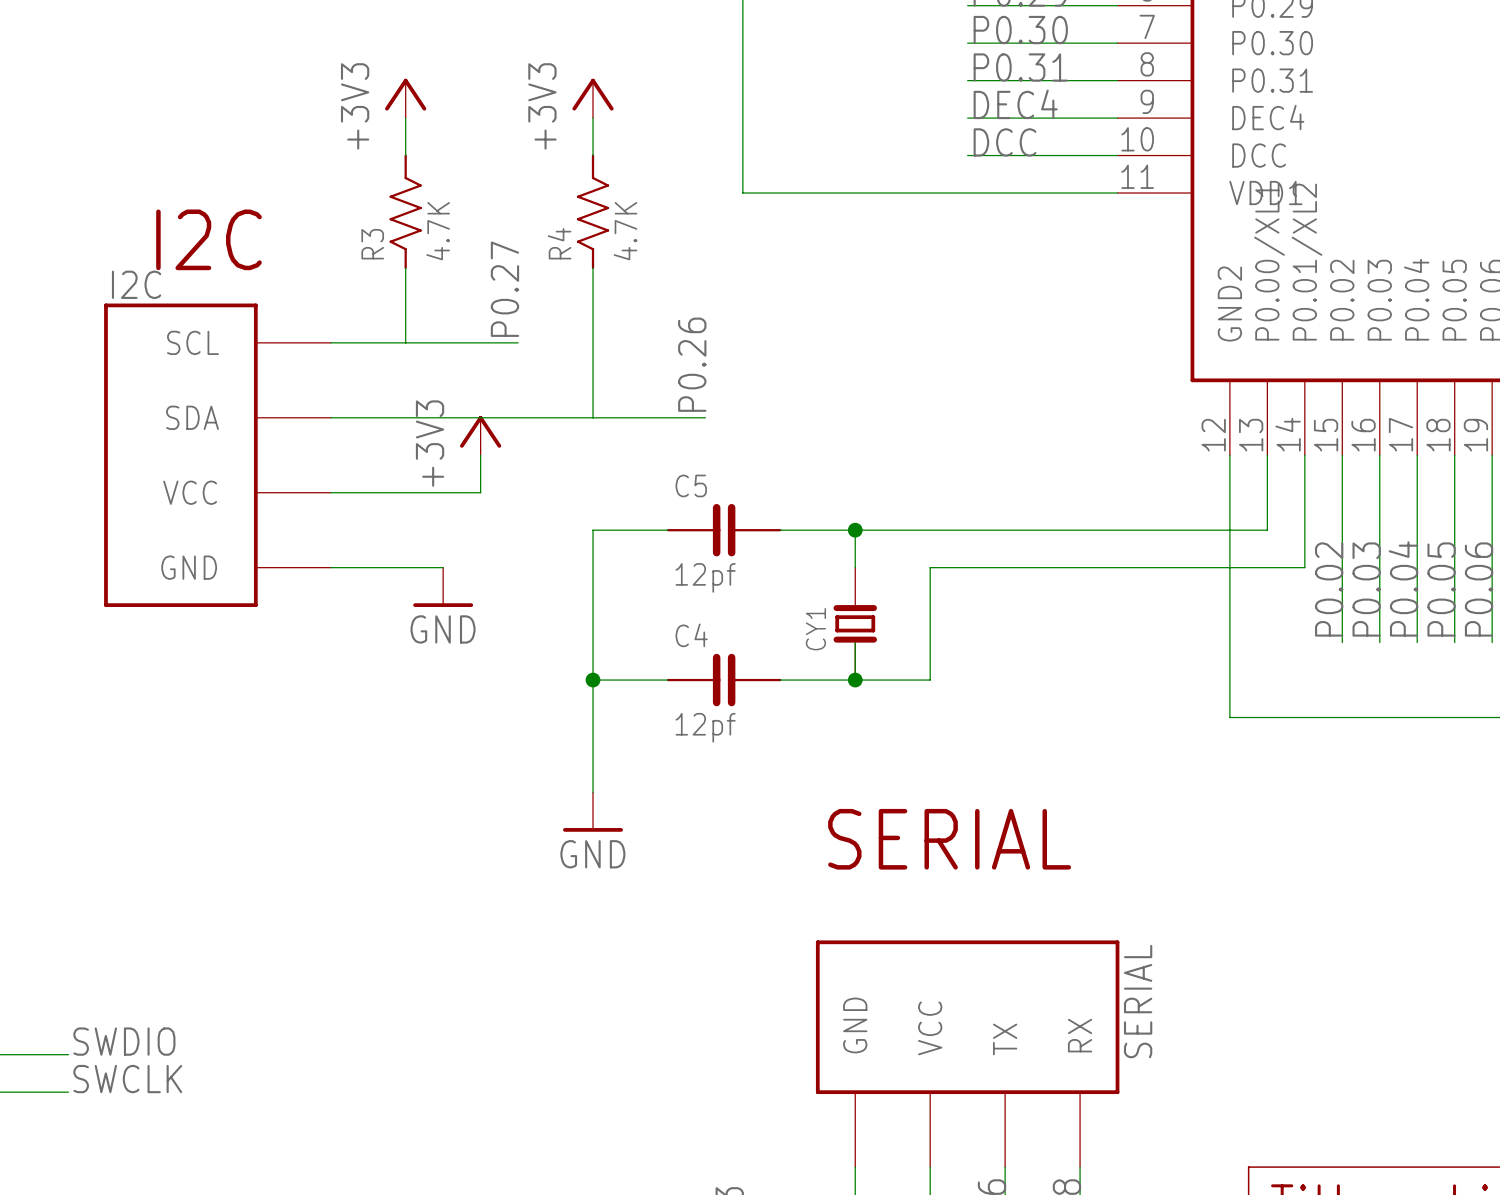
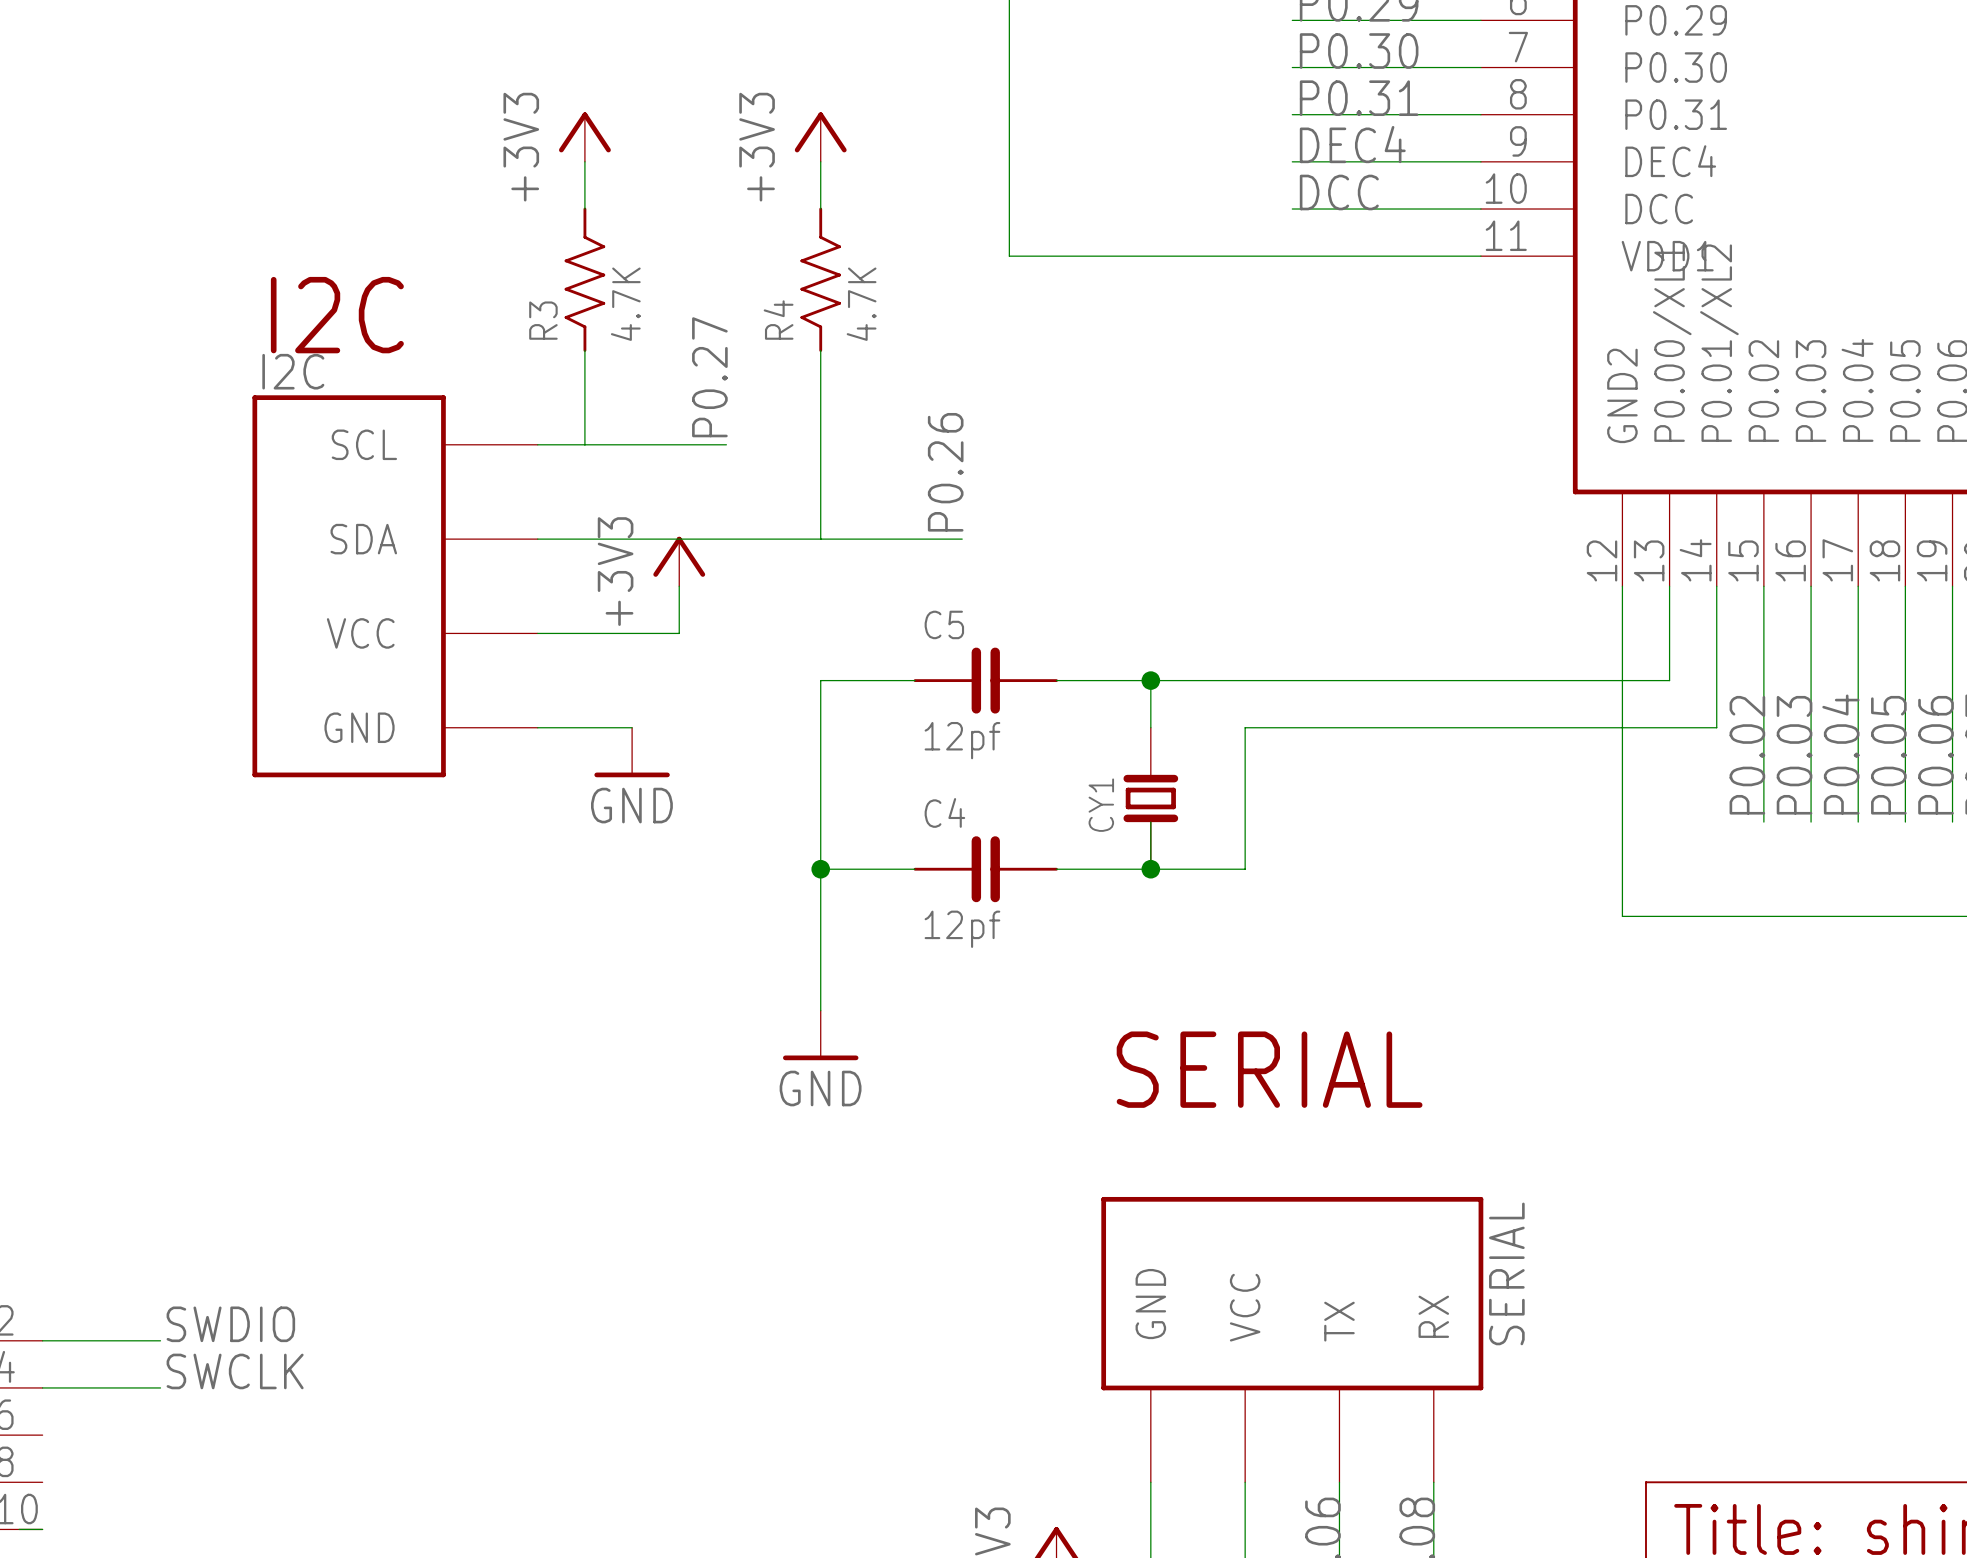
I2C position: (217, 455) -> (395, 586)

